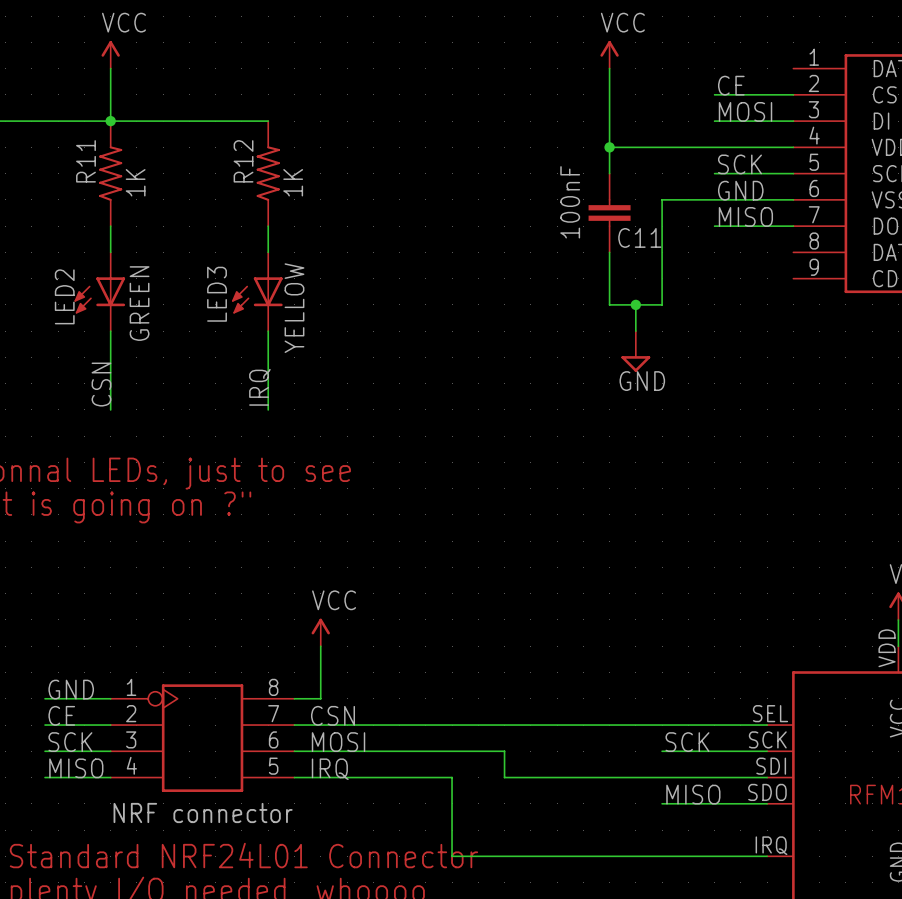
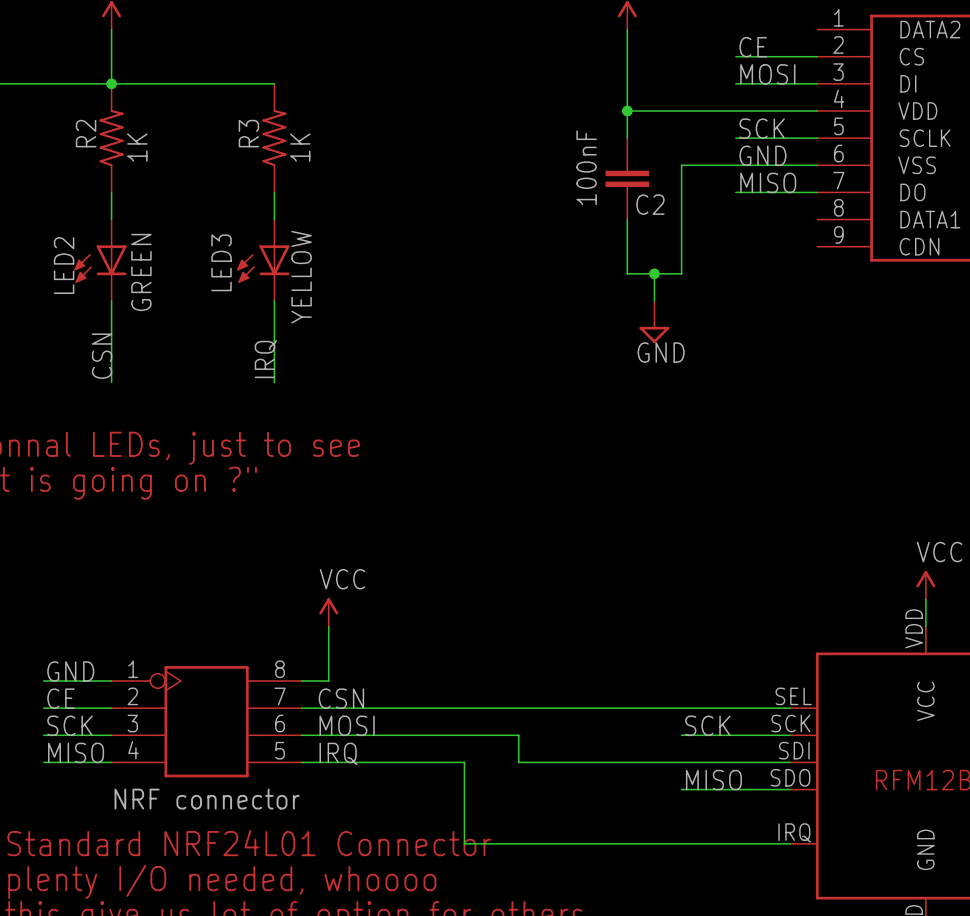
R11 name: R11 (86, 161) -> R2 (86, 133)
R12 name: R12 (243, 161) -> R3 (248, 133)
C11 name: C11 (639, 237) -> C2 (650, 204)

